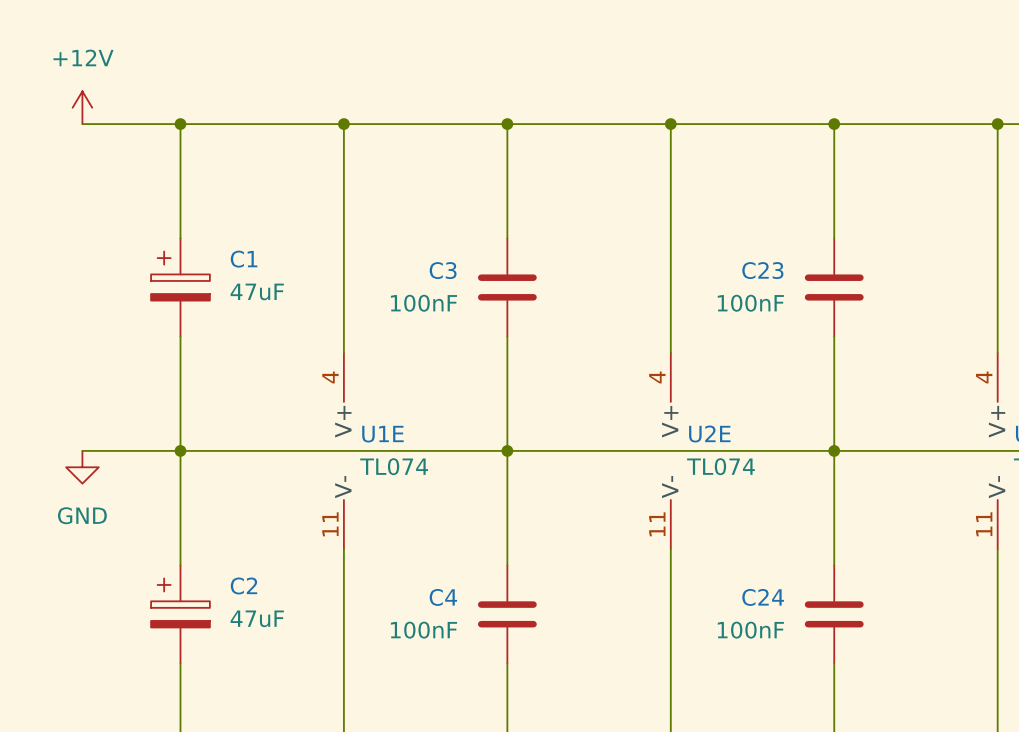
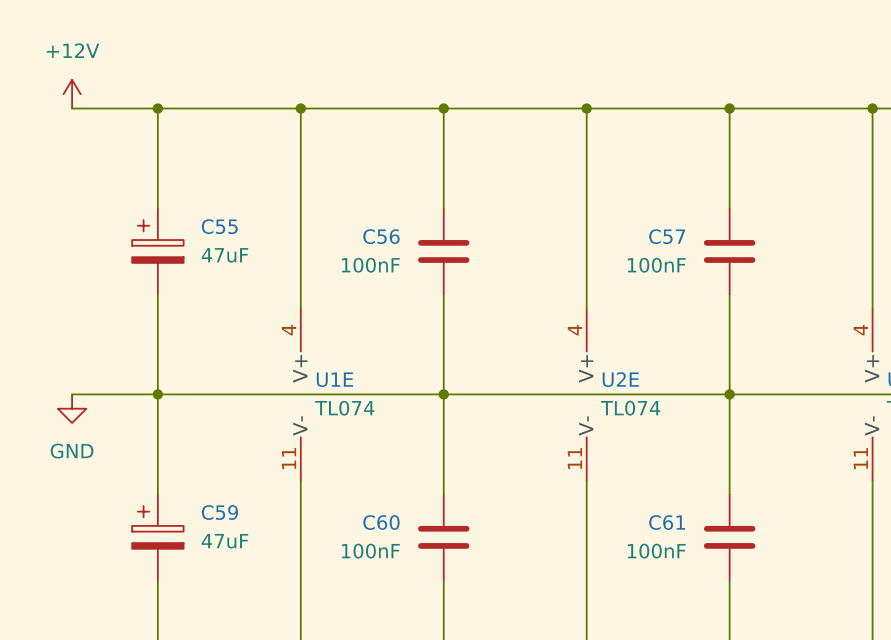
C1 name: C1 (244, 259) -> C55 (219, 226)
C3 name: C3 (443, 270) -> C56 (381, 236)
C23 name: C23 (762, 270) -> C57 (667, 236)
C2 name: C2 (243, 586) -> C59 (219, 512)
C4 name: C4 (443, 597) -> C60 (381, 522)
C24 name: C24 (763, 597) -> C61 (667, 522)

